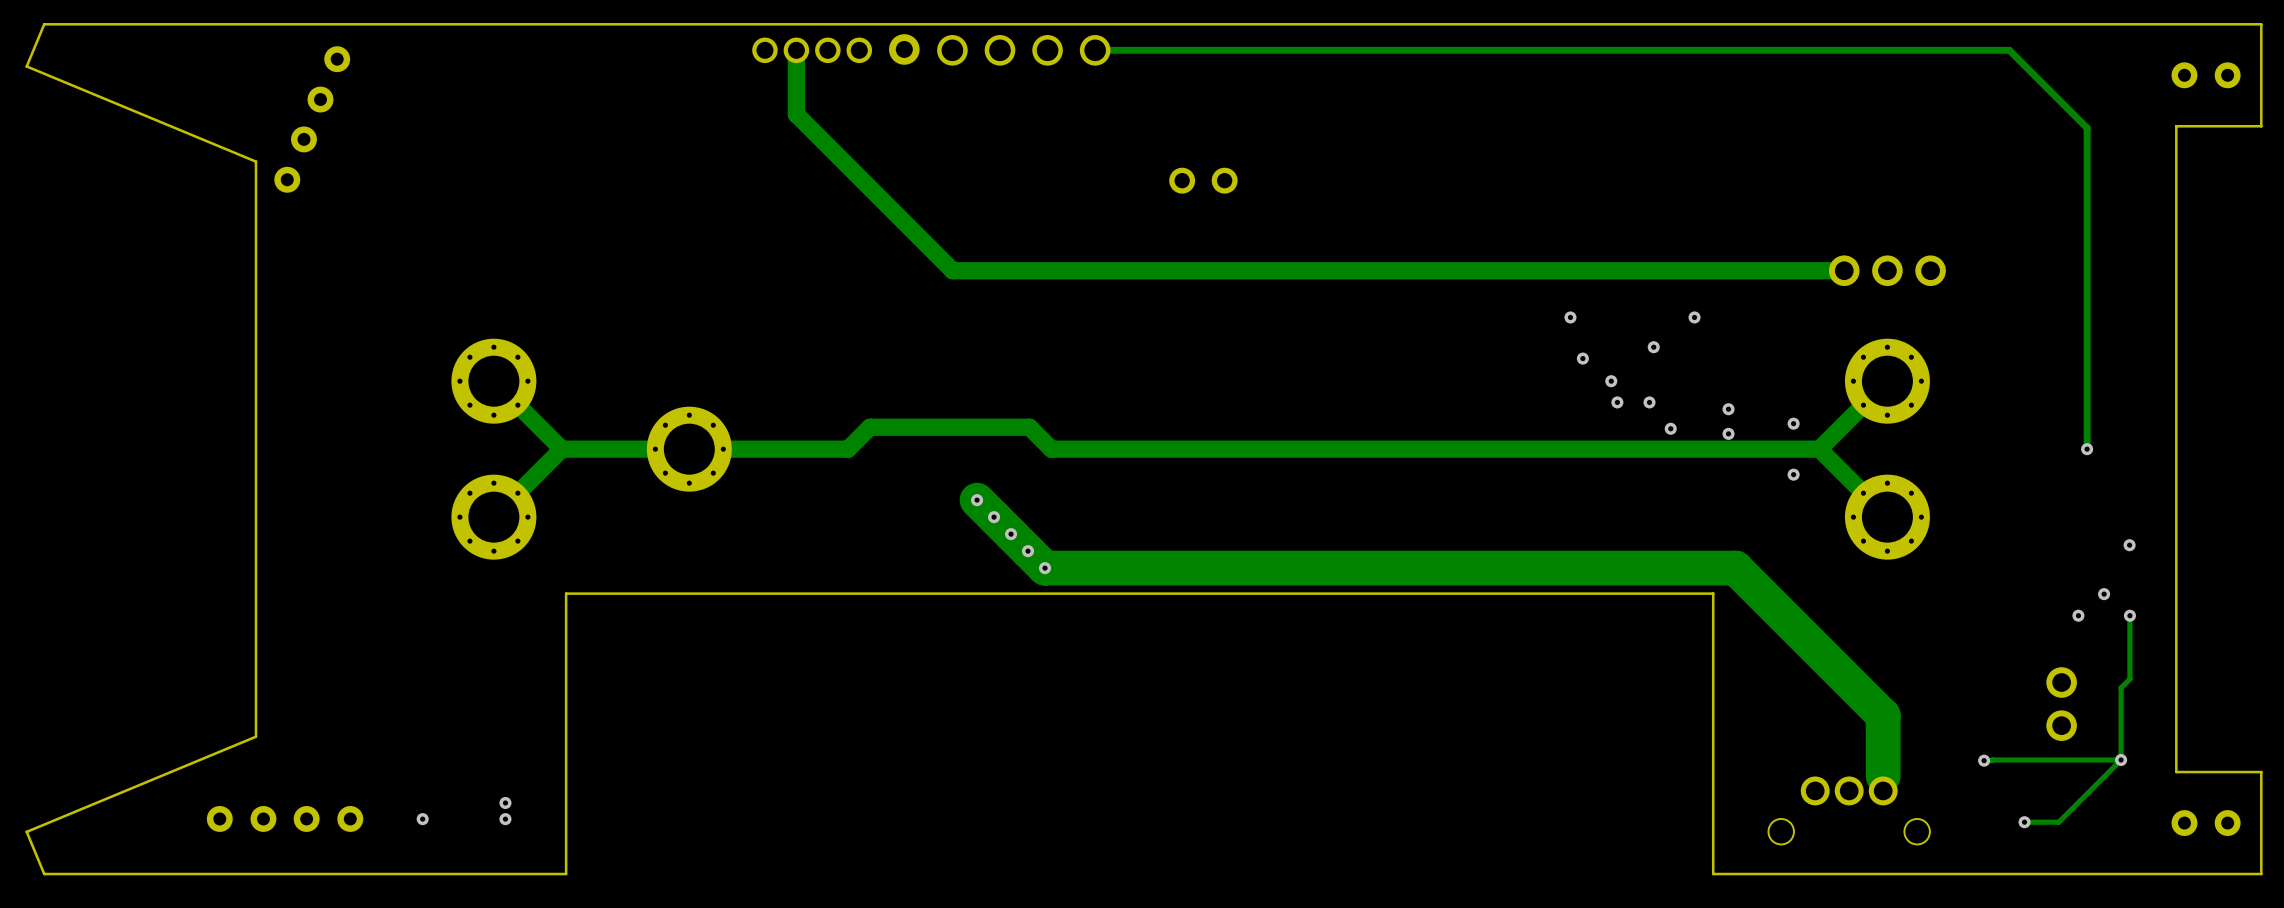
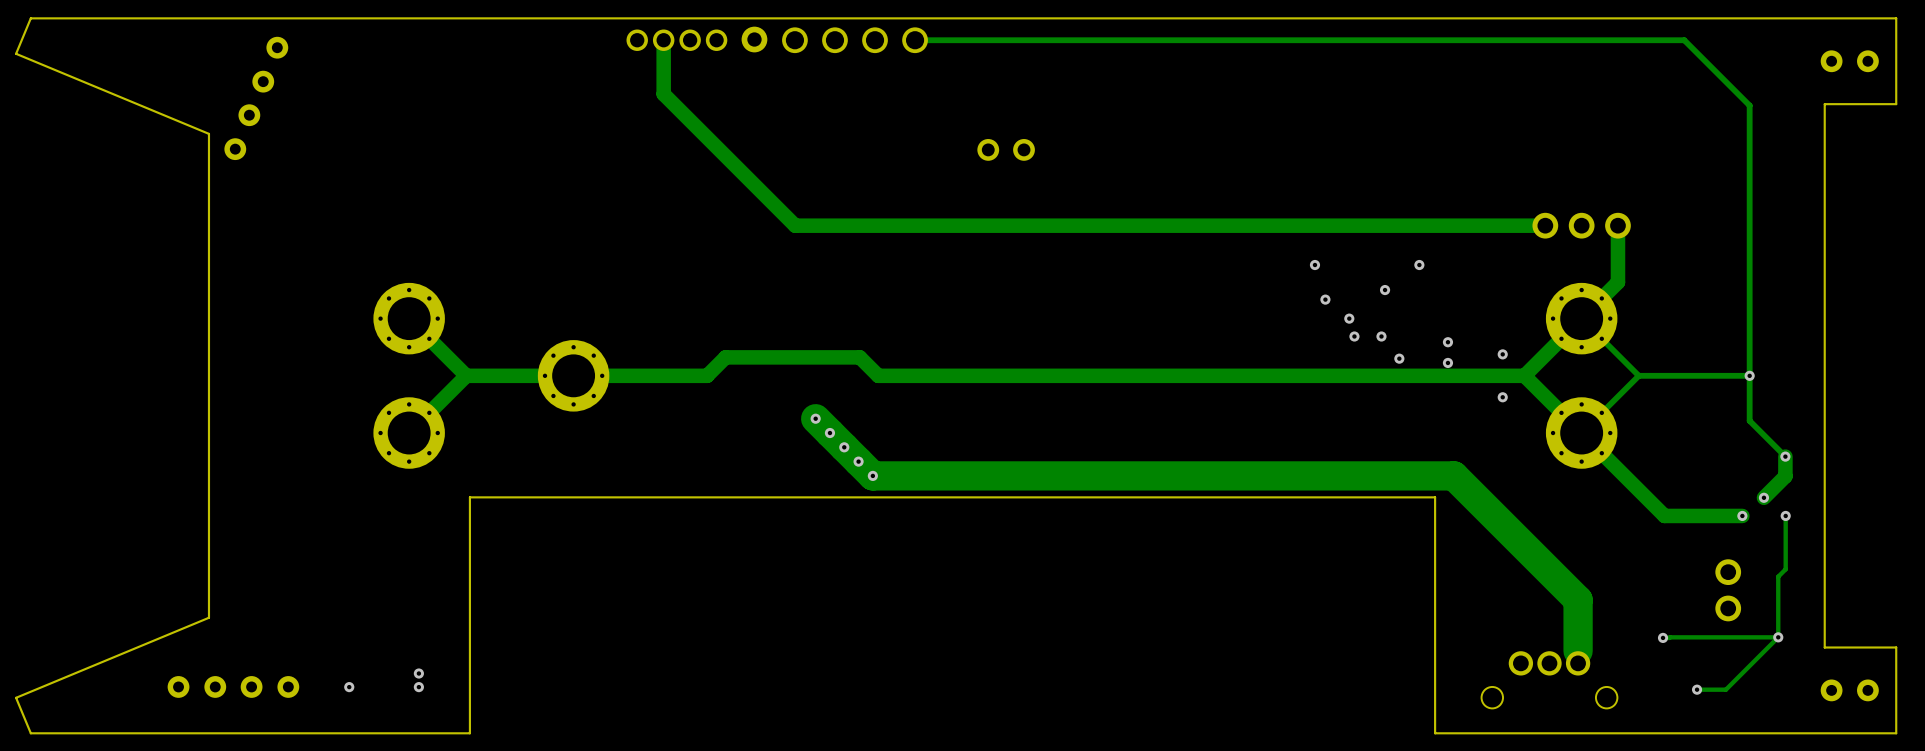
track: none -> (1617, 225) (1617, 282) (1581, 318) (1638, 375)
track: none -> (1638, 375) (1581, 433) (1664, 515) (1742, 515)
track: none -> (1638, 375) (1749, 375) (1749, 420) (1785, 456) (1785, 476) (1763, 497)

